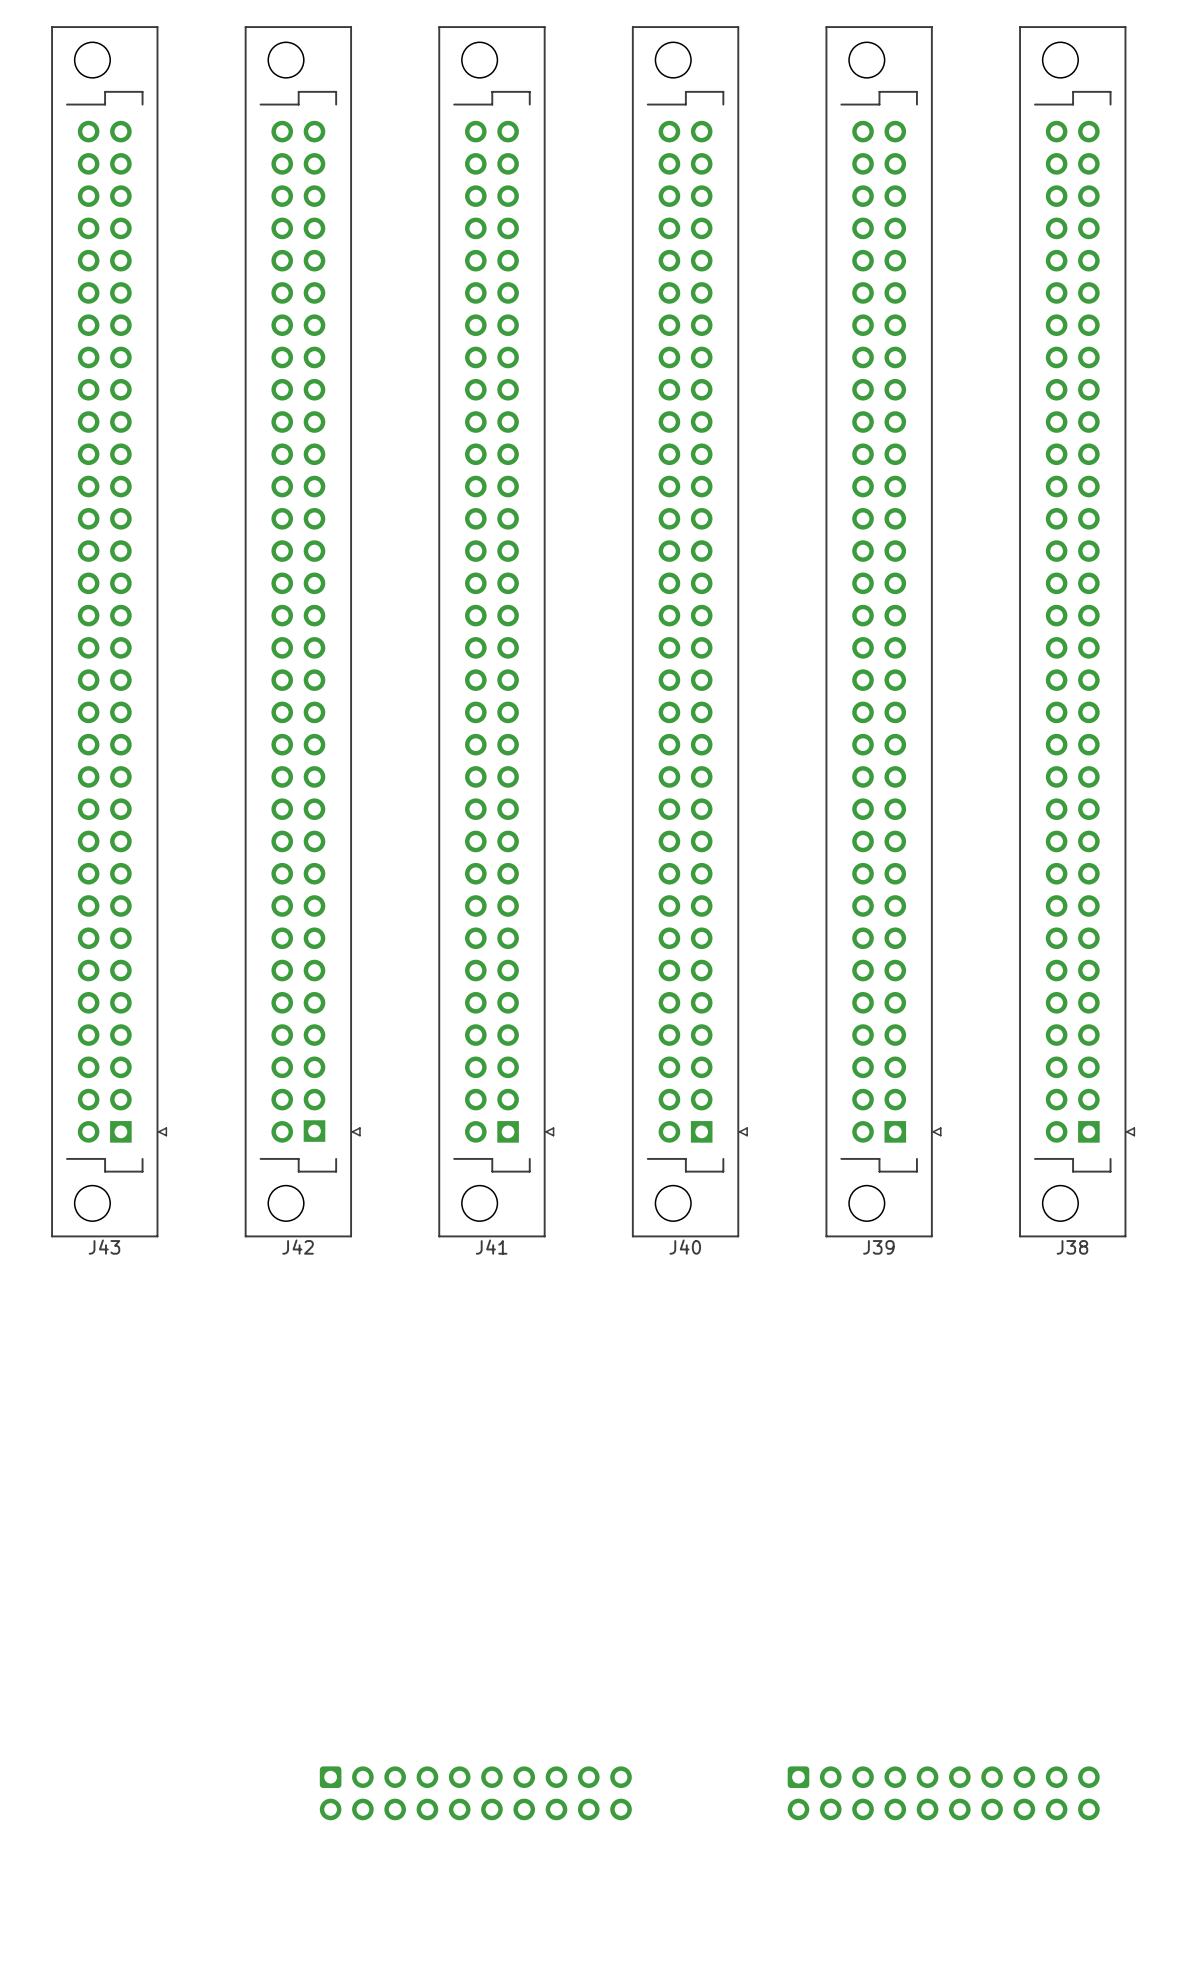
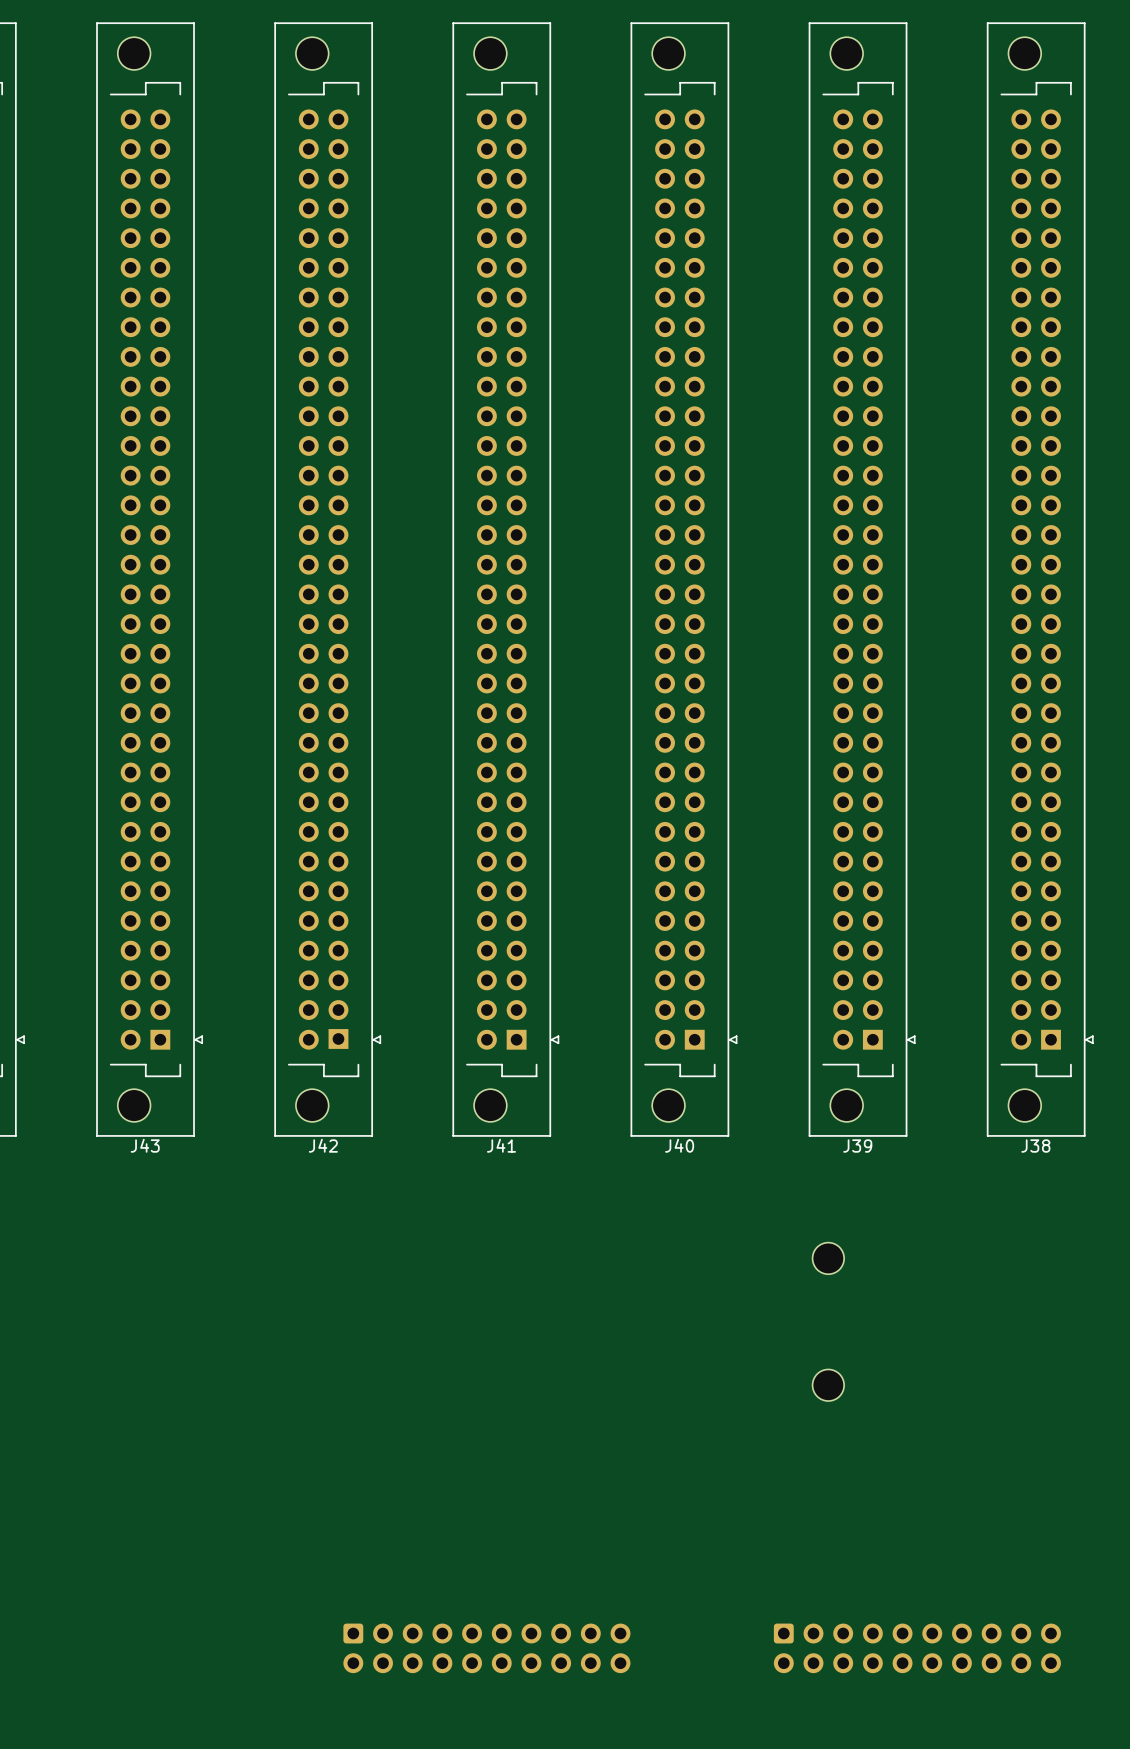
part: none -> (828, 1258)
part: none -> (828, 1385)

